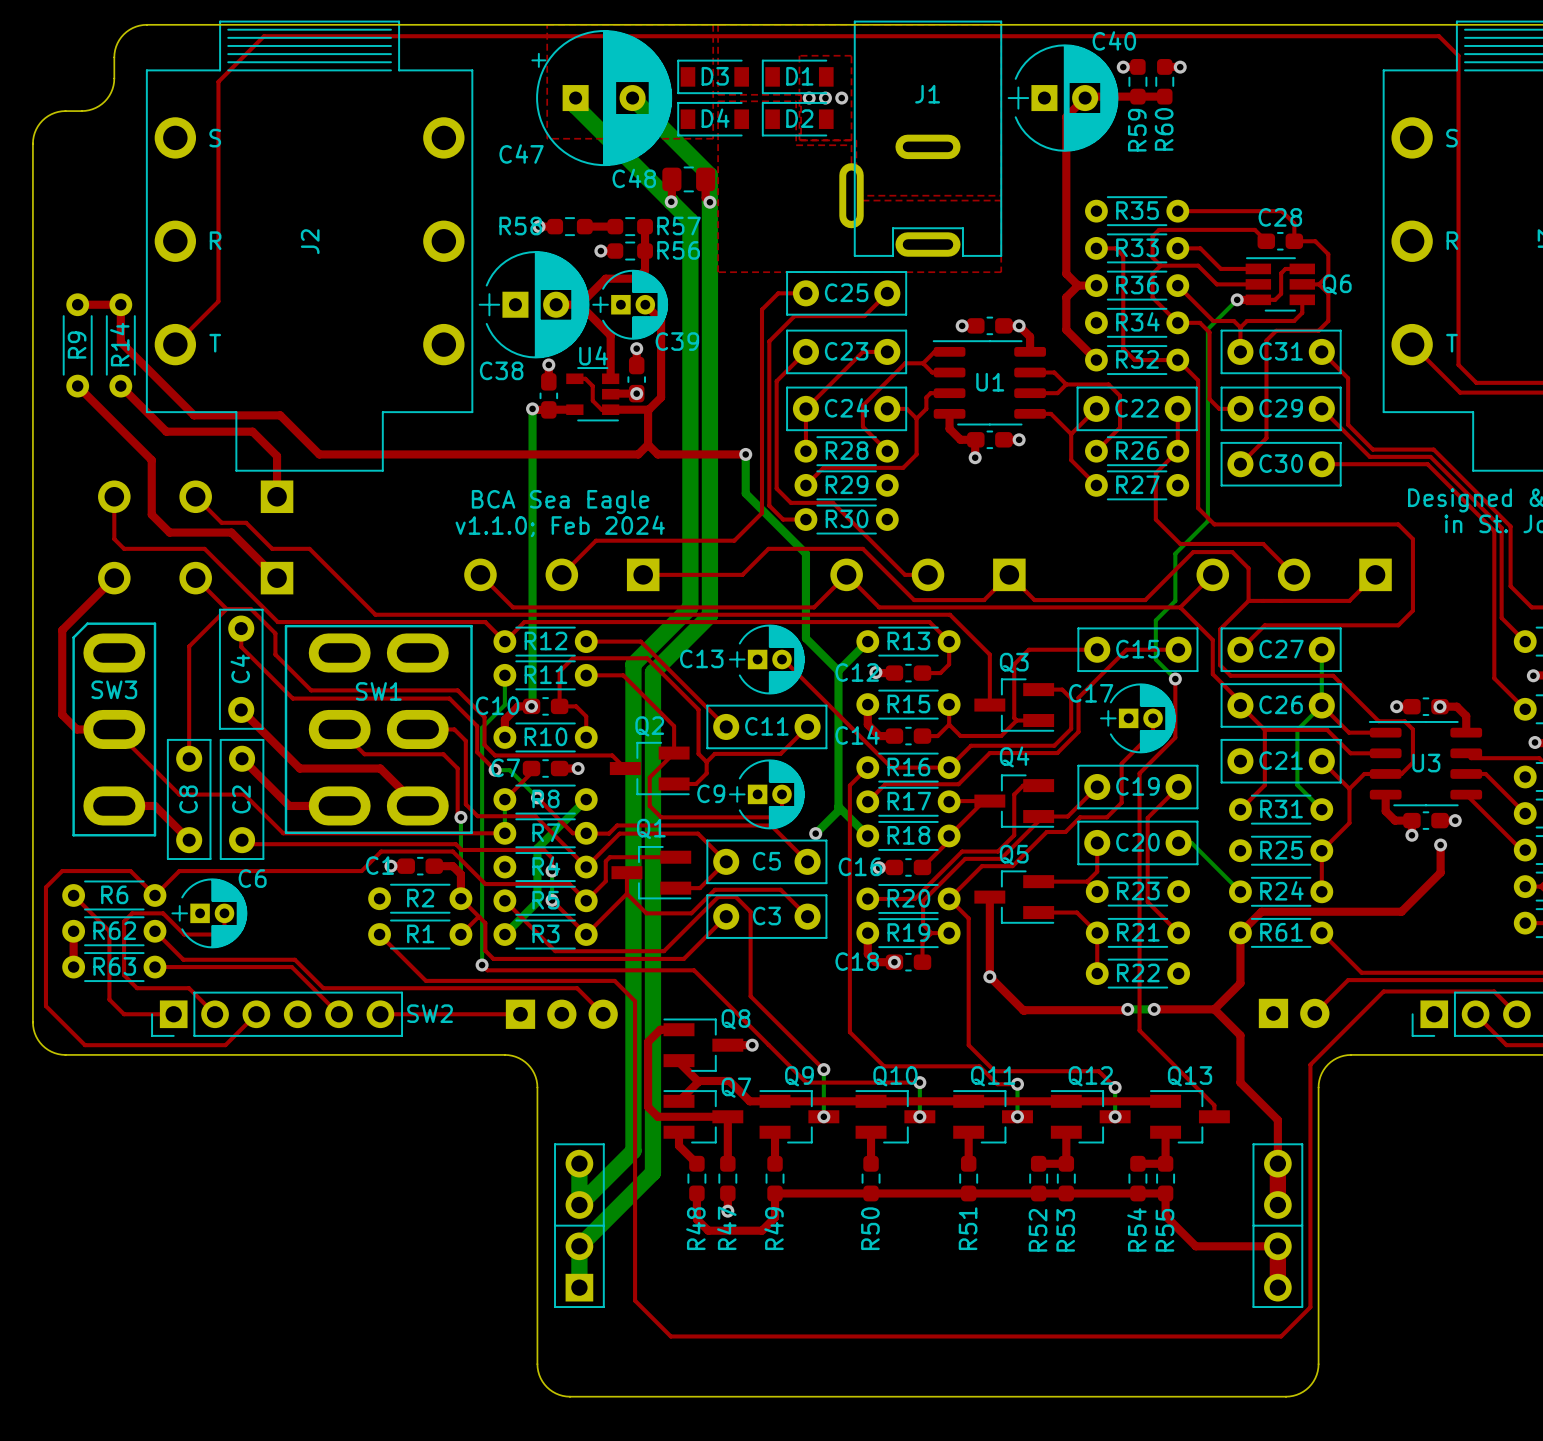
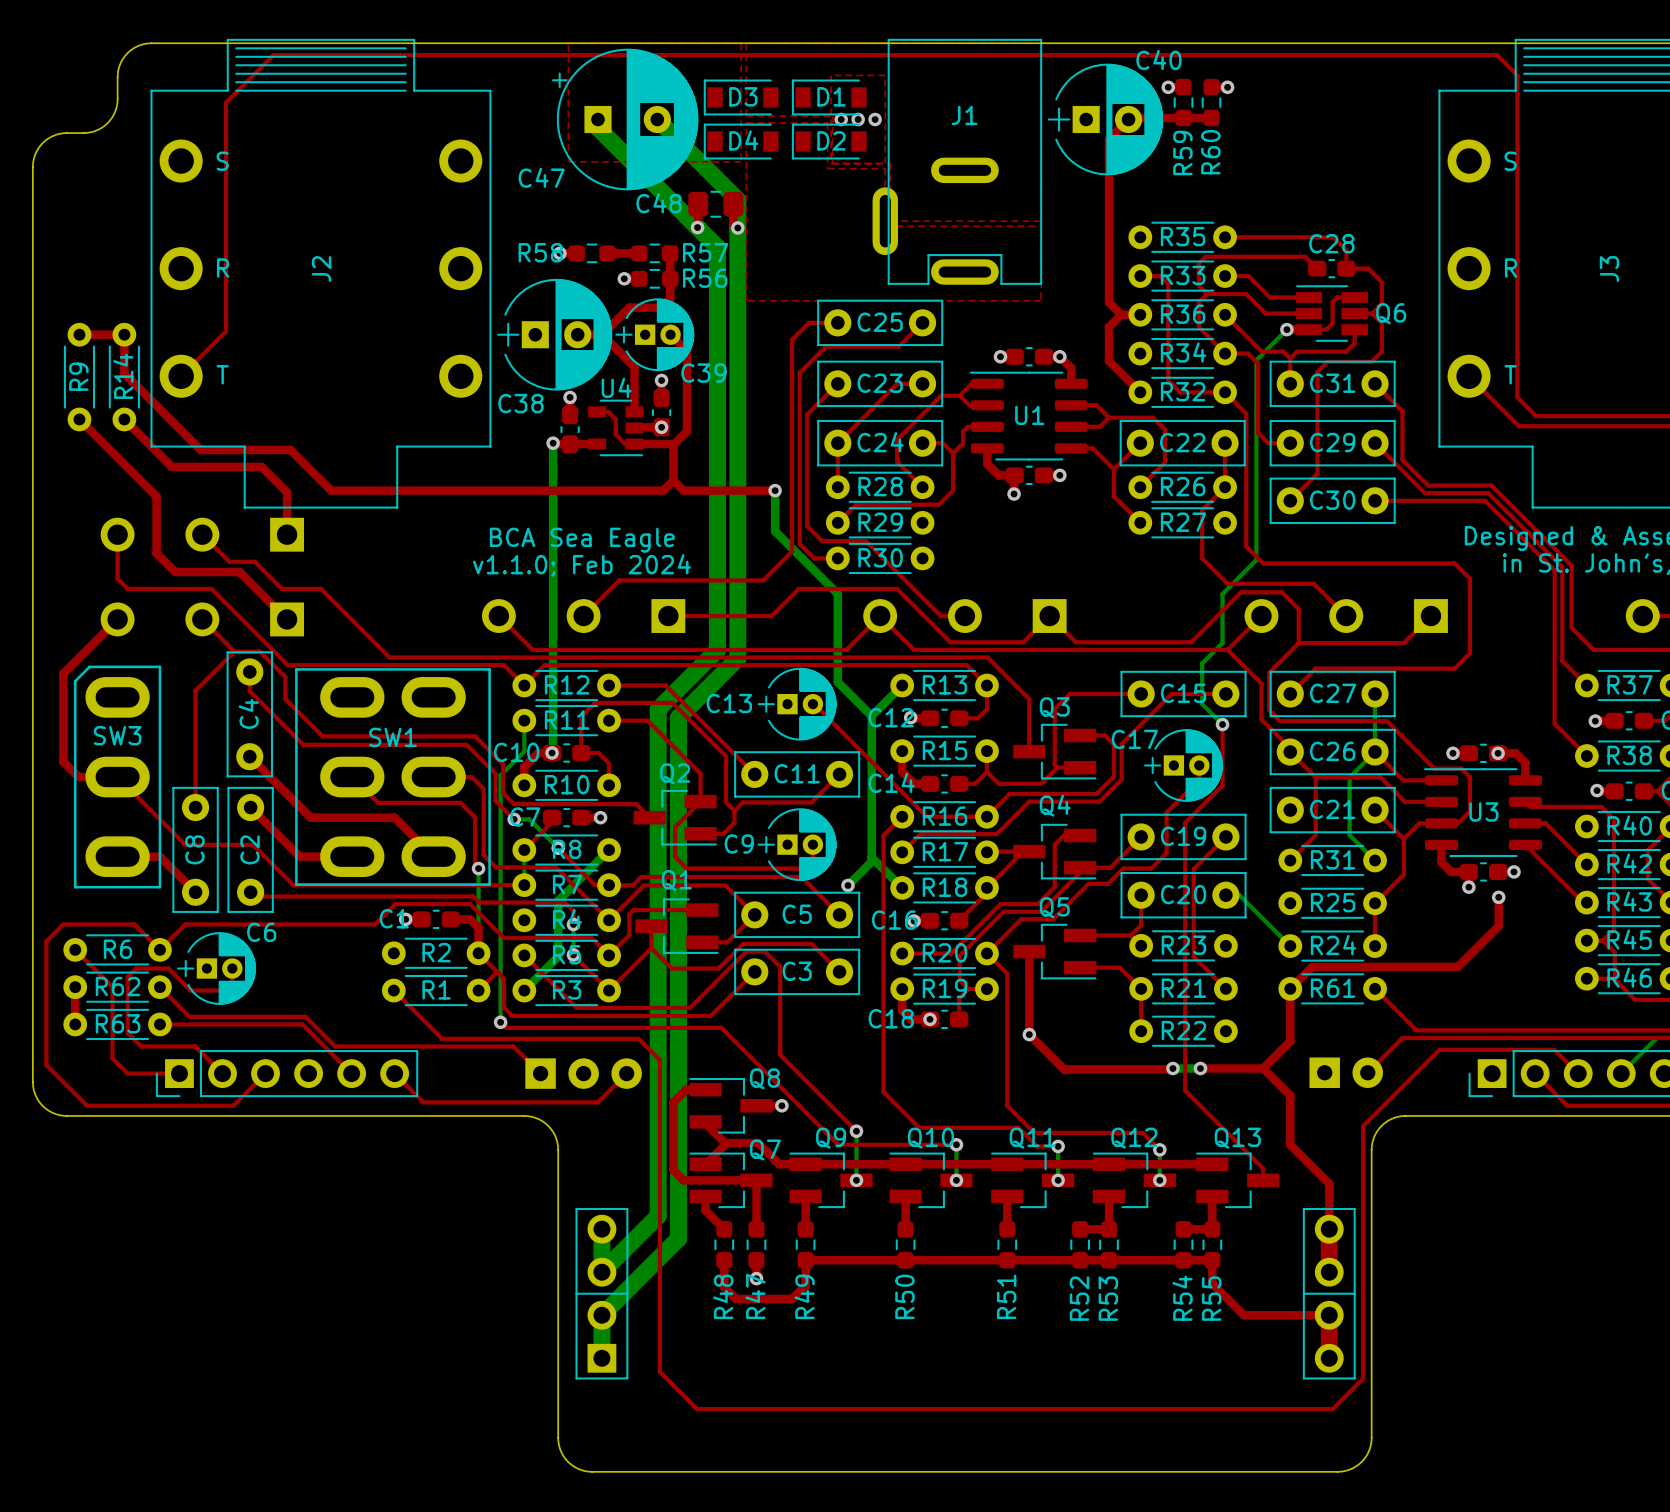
top track: (494, 988) (577, 988) (603, 1014) -> (513, 1046) (540, 1073)
SW2 name: SW2 (430, 1013) -> none
top track: (380, 1014) (520, 1014) -> (394, 1073) (423, 1102) (597, 1102) (626, 1073)

